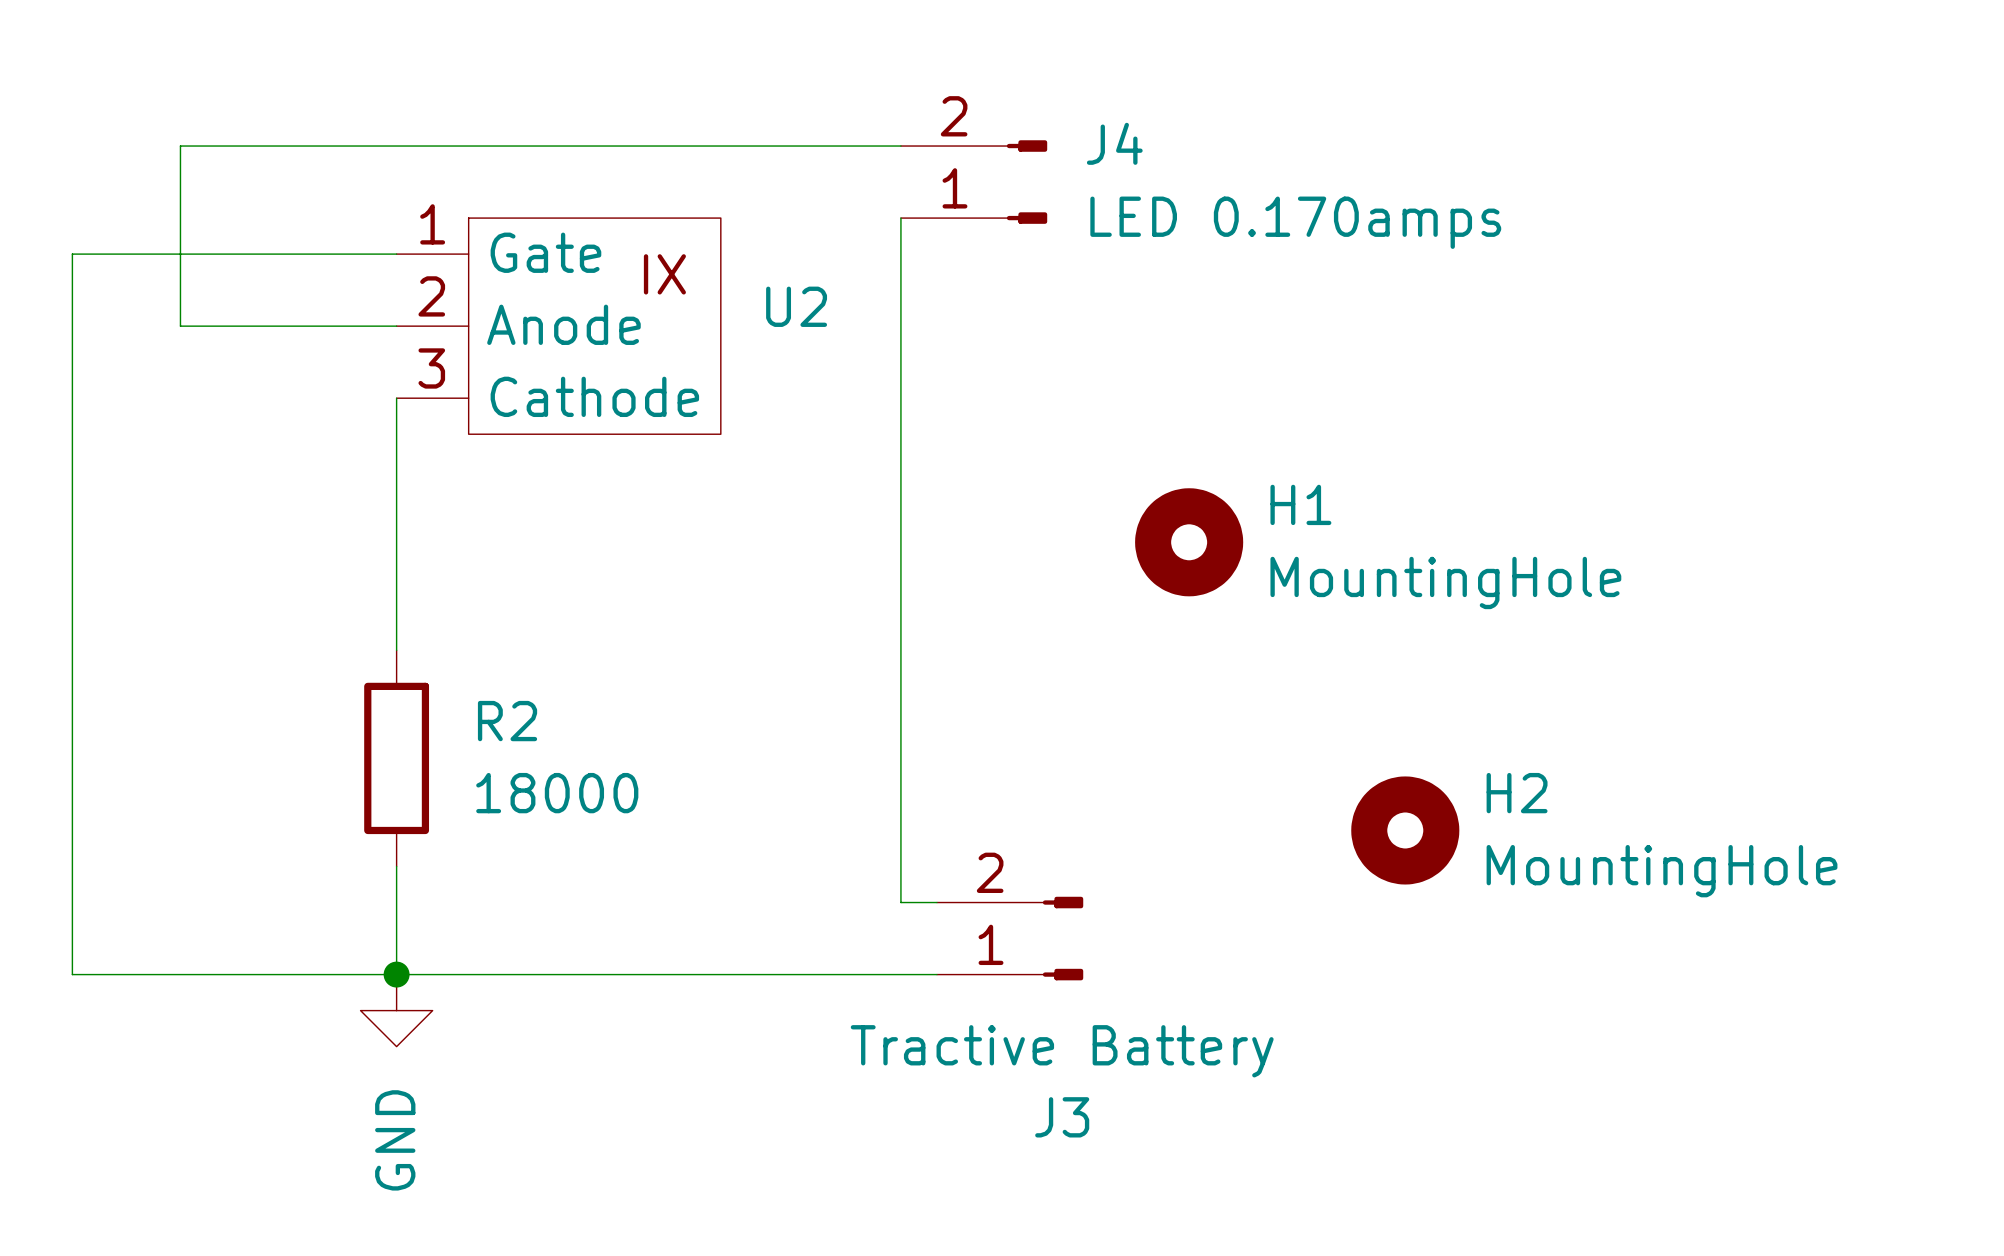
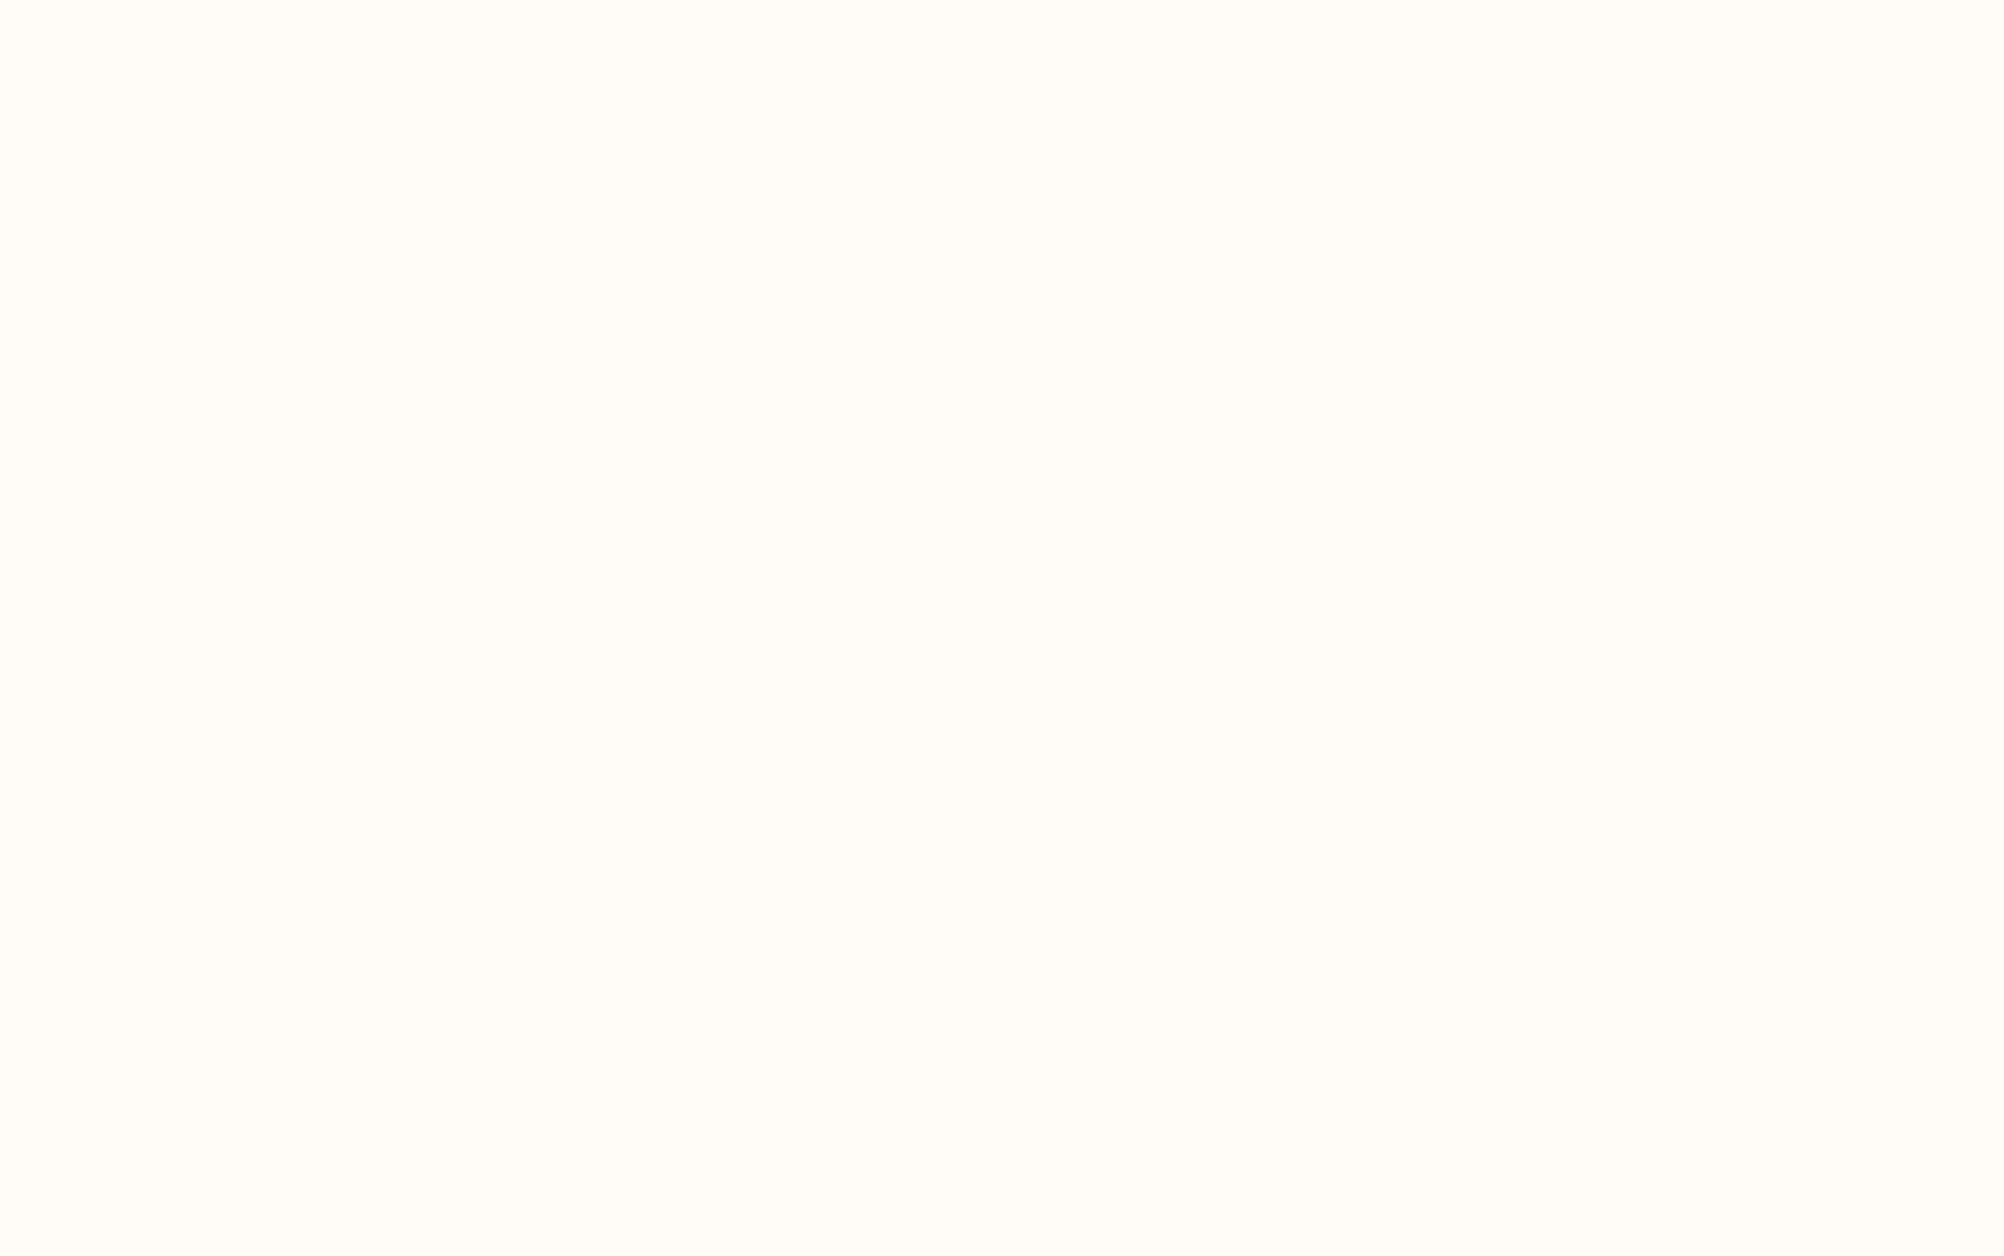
wire: (900, 146) (180, 146) (180, 326) (396, 326) -> none
J4: LED 0.170amps (974, 182) -> none
wire: (900, 218) (900, 902) (936, 902) -> none
wire: (396, 254) (72, 254) (72, 974) (936, 974) -> none
U2: (558, 344) -> none
wire: (396, 398) (396, 650) -> none
H1: MountingHole (1189, 542) -> none
R2: 18000 (396, 758) -> none
H2: MountingHole (1405, 830) -> none
wire: (396, 866) (396, 974) -> none
J3: Tractive Battery (1010, 938) -> none
junction: (396, 974) -> none
power symbol: GND (396, 1010) -> none

